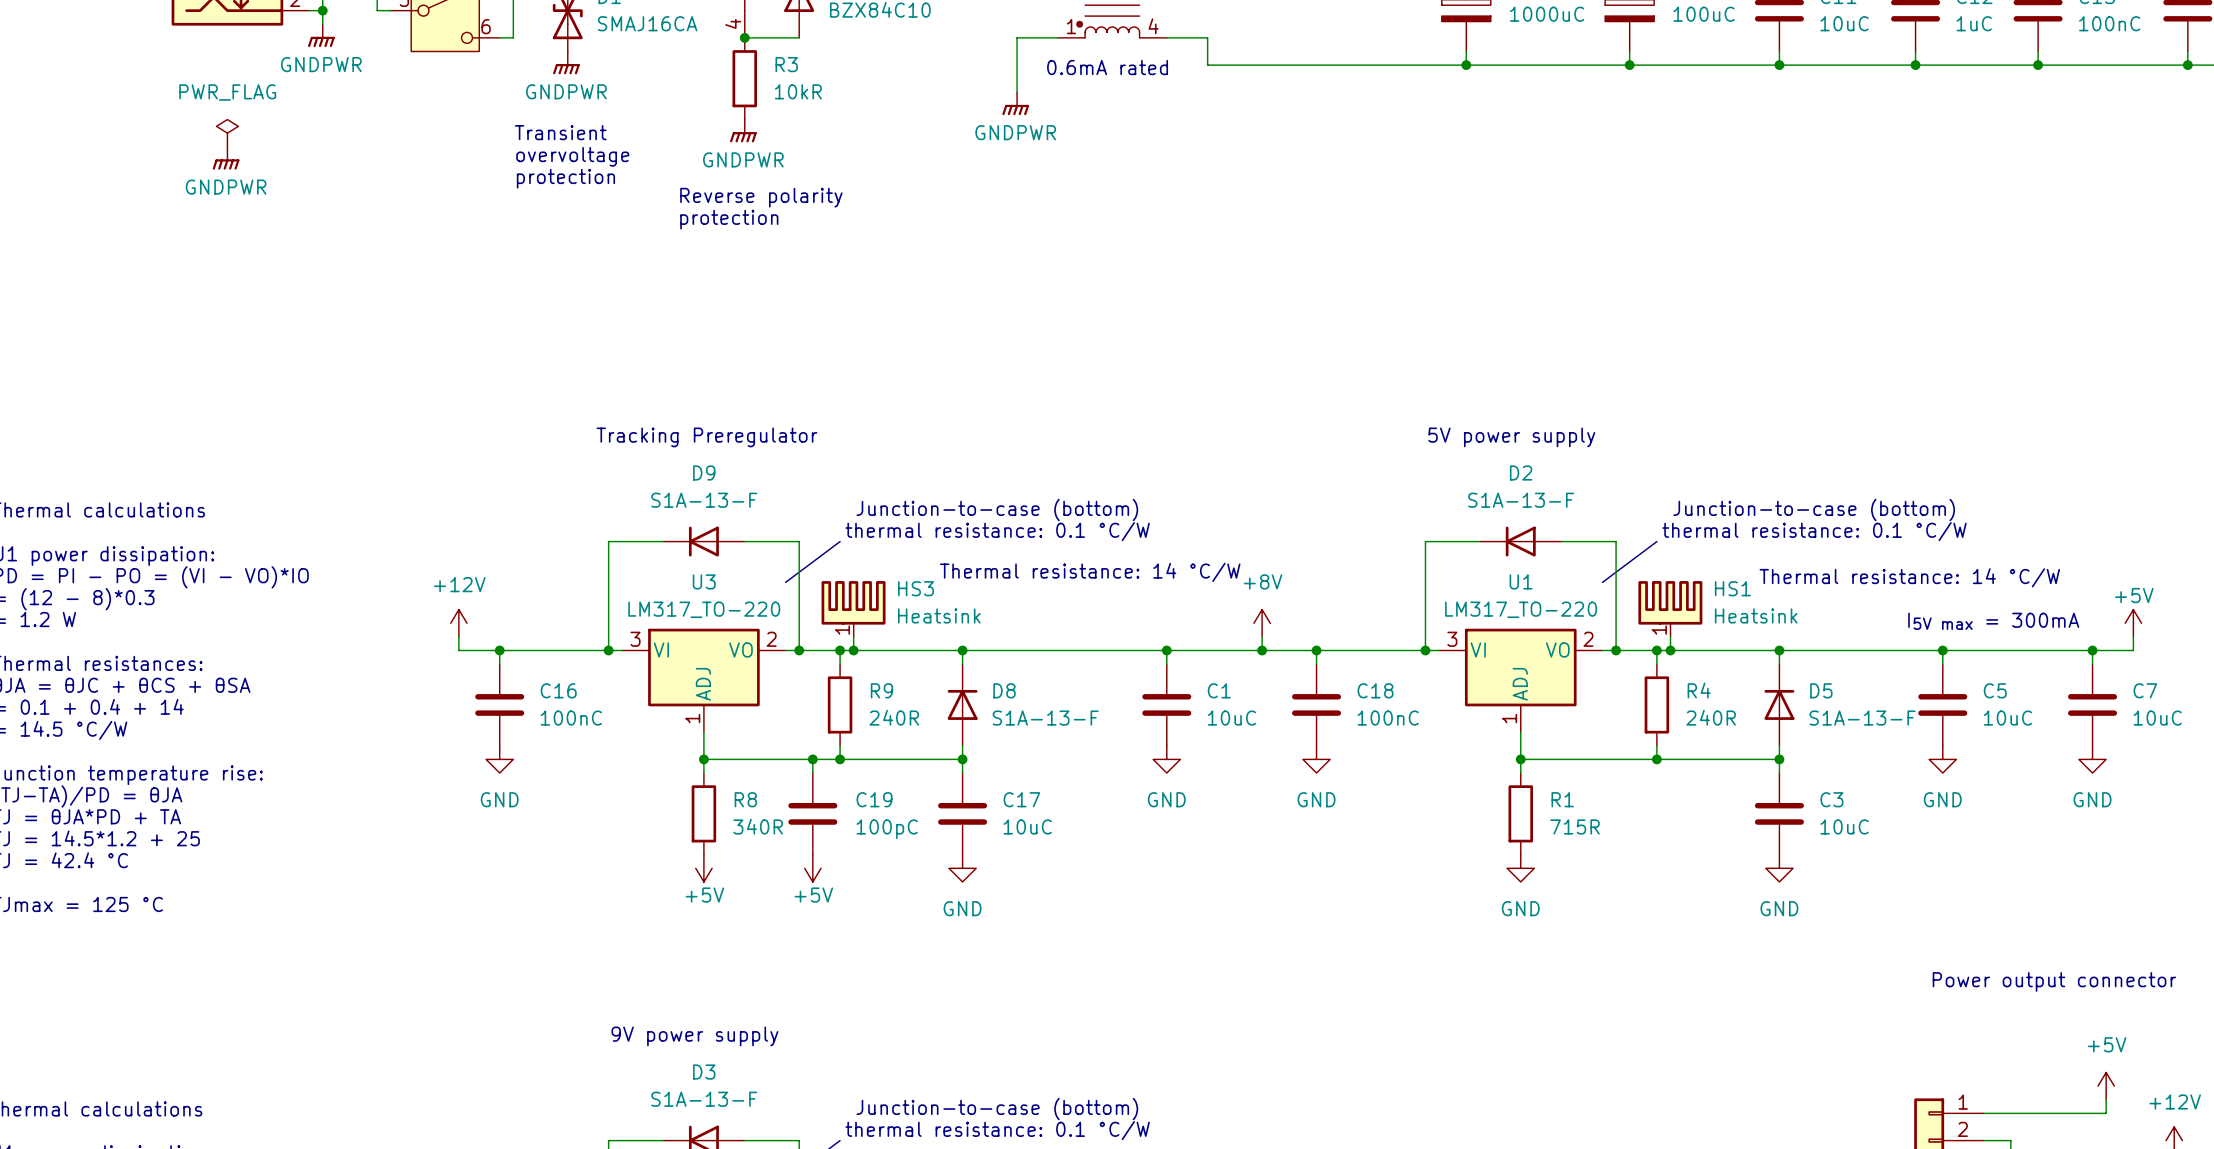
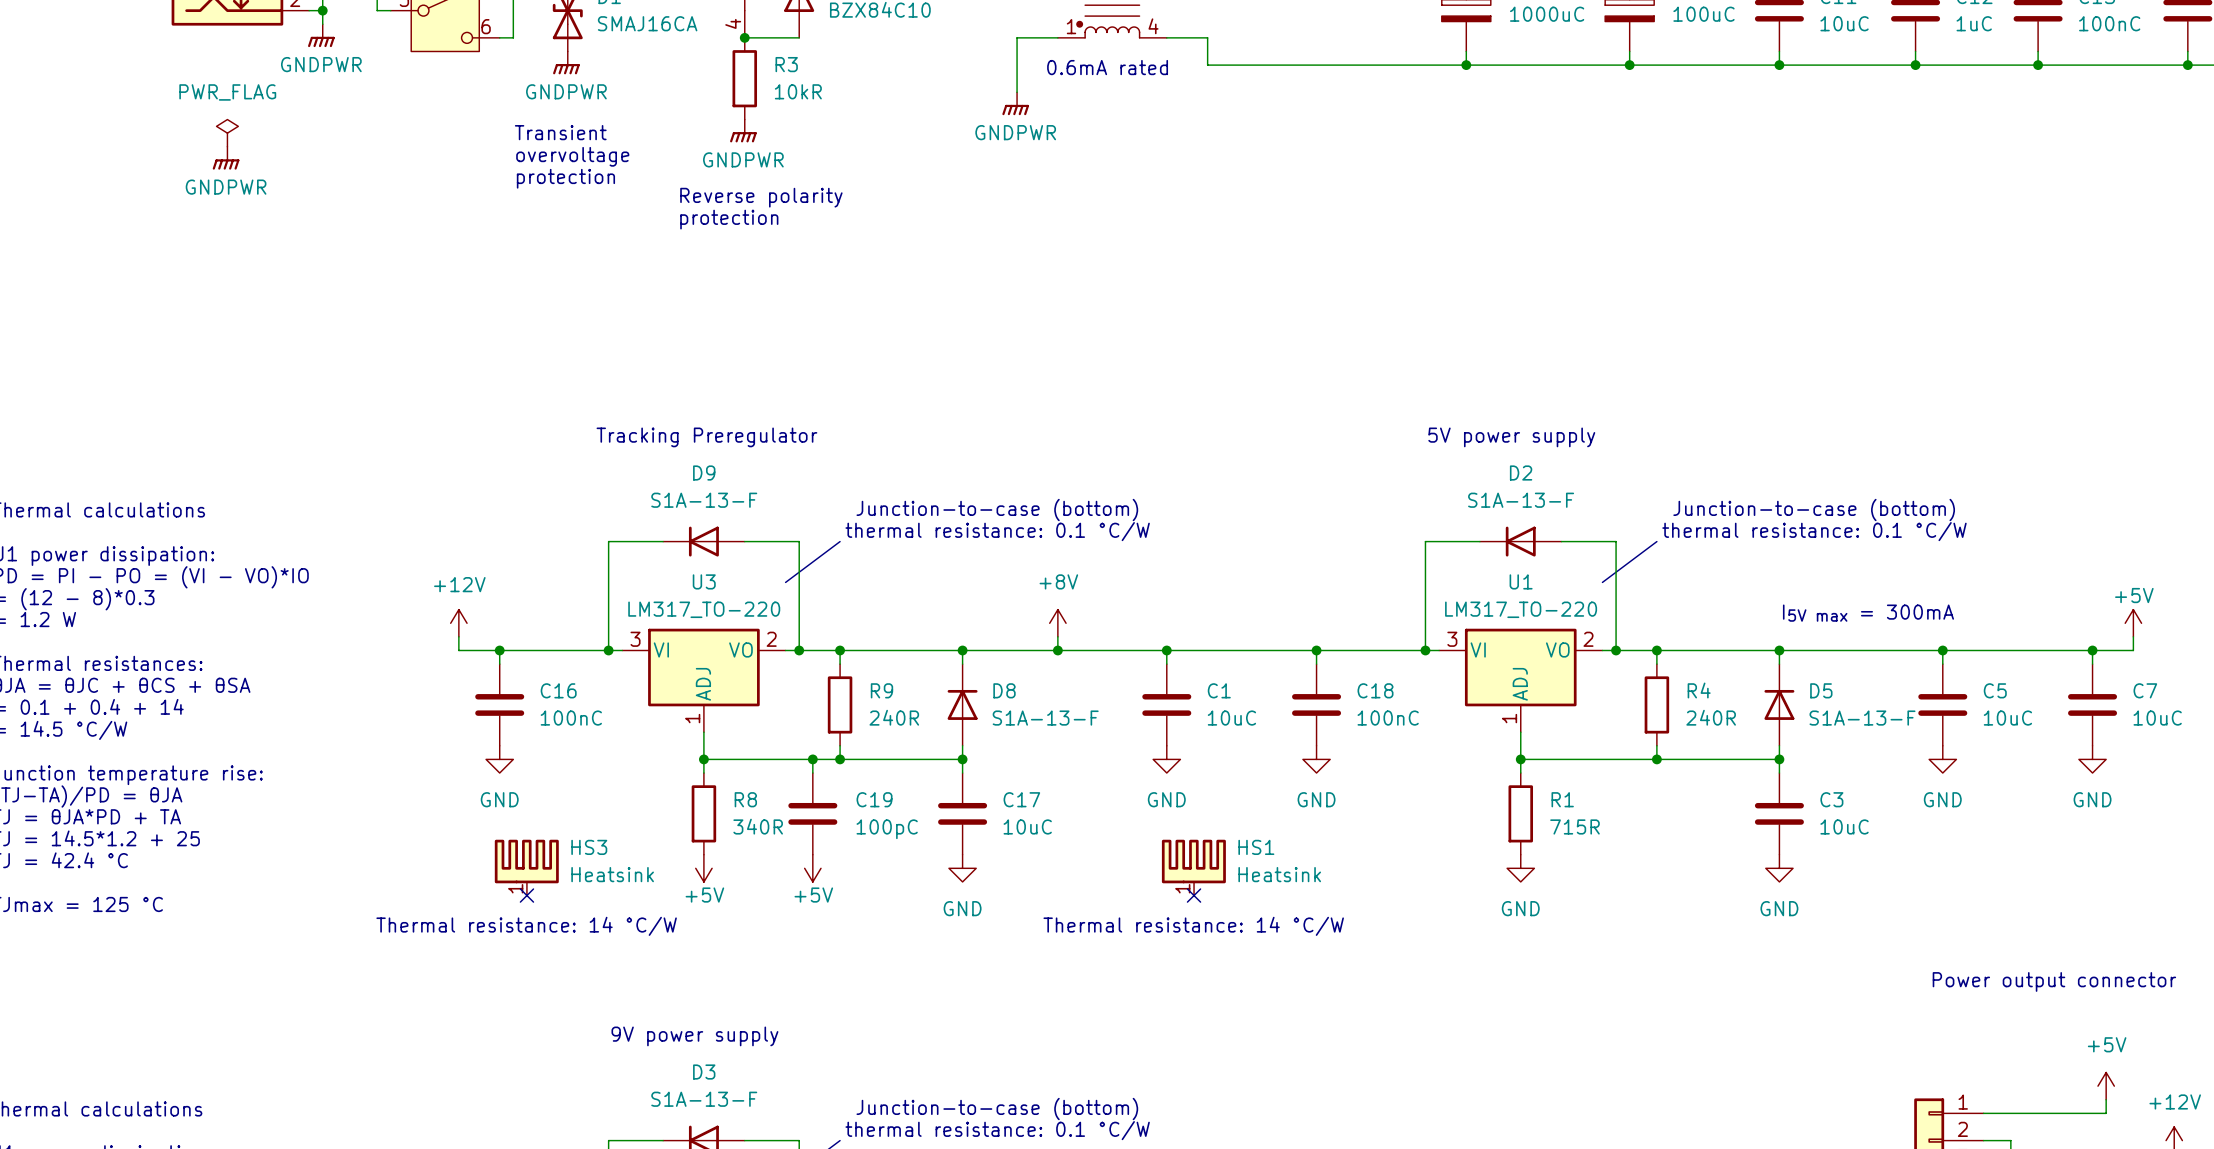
text: Thermal resistance: 14 °C/W (1090, 572) -> none
text: Thermal resistance: 14 °C/W (1909, 577) -> none
HS3 position: (853, 608) -> (526, 867)
HS1 position: (1670, 608) -> (1193, 867)
text position: I5V max = 300mA (1993, 621) -> I5V max = 300mA (1868, 613)
power symbol position: +8V (1262, 623) -> +8V (1057, 623)
wire: (853, 636) (853, 650) -> none
wire: (1262, 636) (1262, 650) -> (1057, 636) (1057, 650)
wire: (1670, 636) (1670, 650) -> none
junction: (853, 650) -> none
junction: none -> (1057, 650)
junction: (1262, 650) -> none
junction: (1670, 650) -> none
no-connect mark: none -> (526, 895)
no-connect mark: none -> (1194, 895)
text: none -> Thermal resistance: 14 °C/W (526, 926)
text: none -> Thermal resistance: 14 °C/W (1193, 926)

